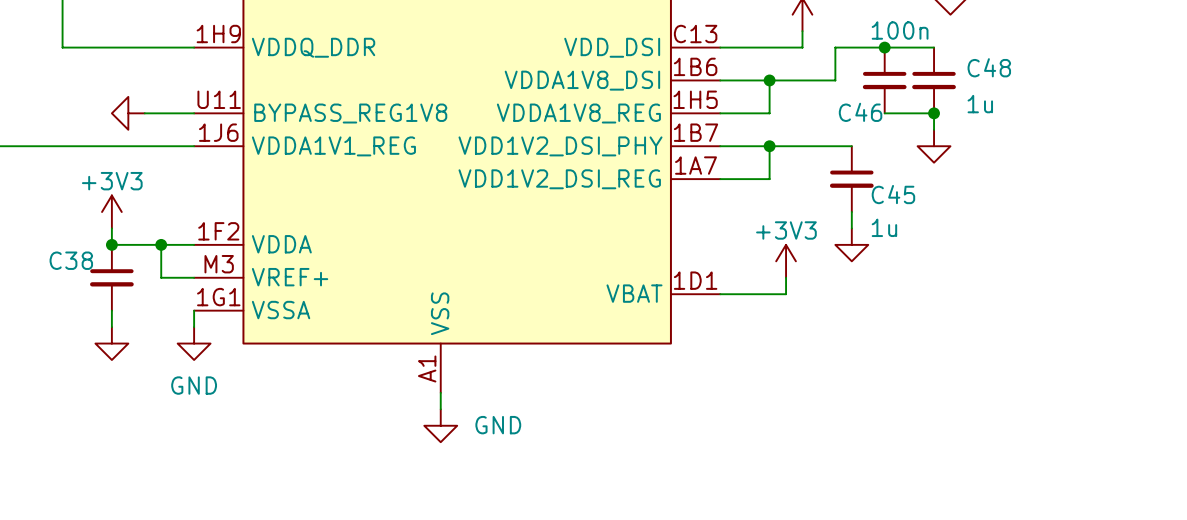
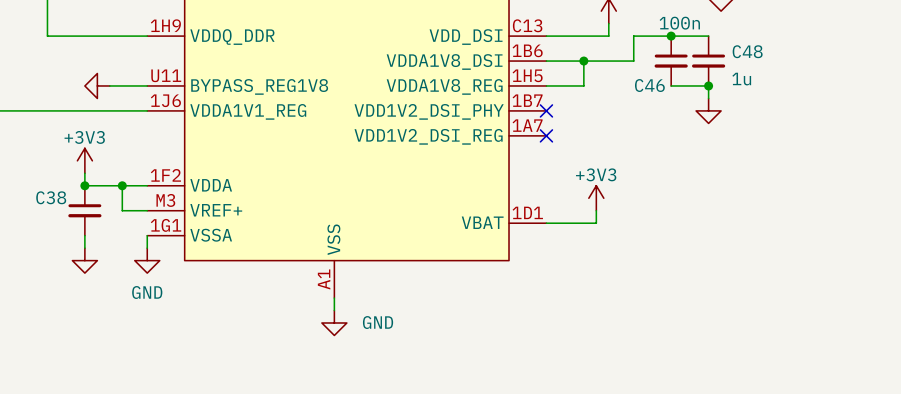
wire: (720, 146) (851, 146) -> none
no-connect mark: none -> (546, 110)
wire: (769, 146) (769, 179) (720, 179) -> none
junction: (769, 146) -> none
no-connect mark: none -> (546, 135)
C45: 1u (851, 179) -> none
wire: (851, 212) (851, 228) -> none
power symbol: (851, 244) -> none

